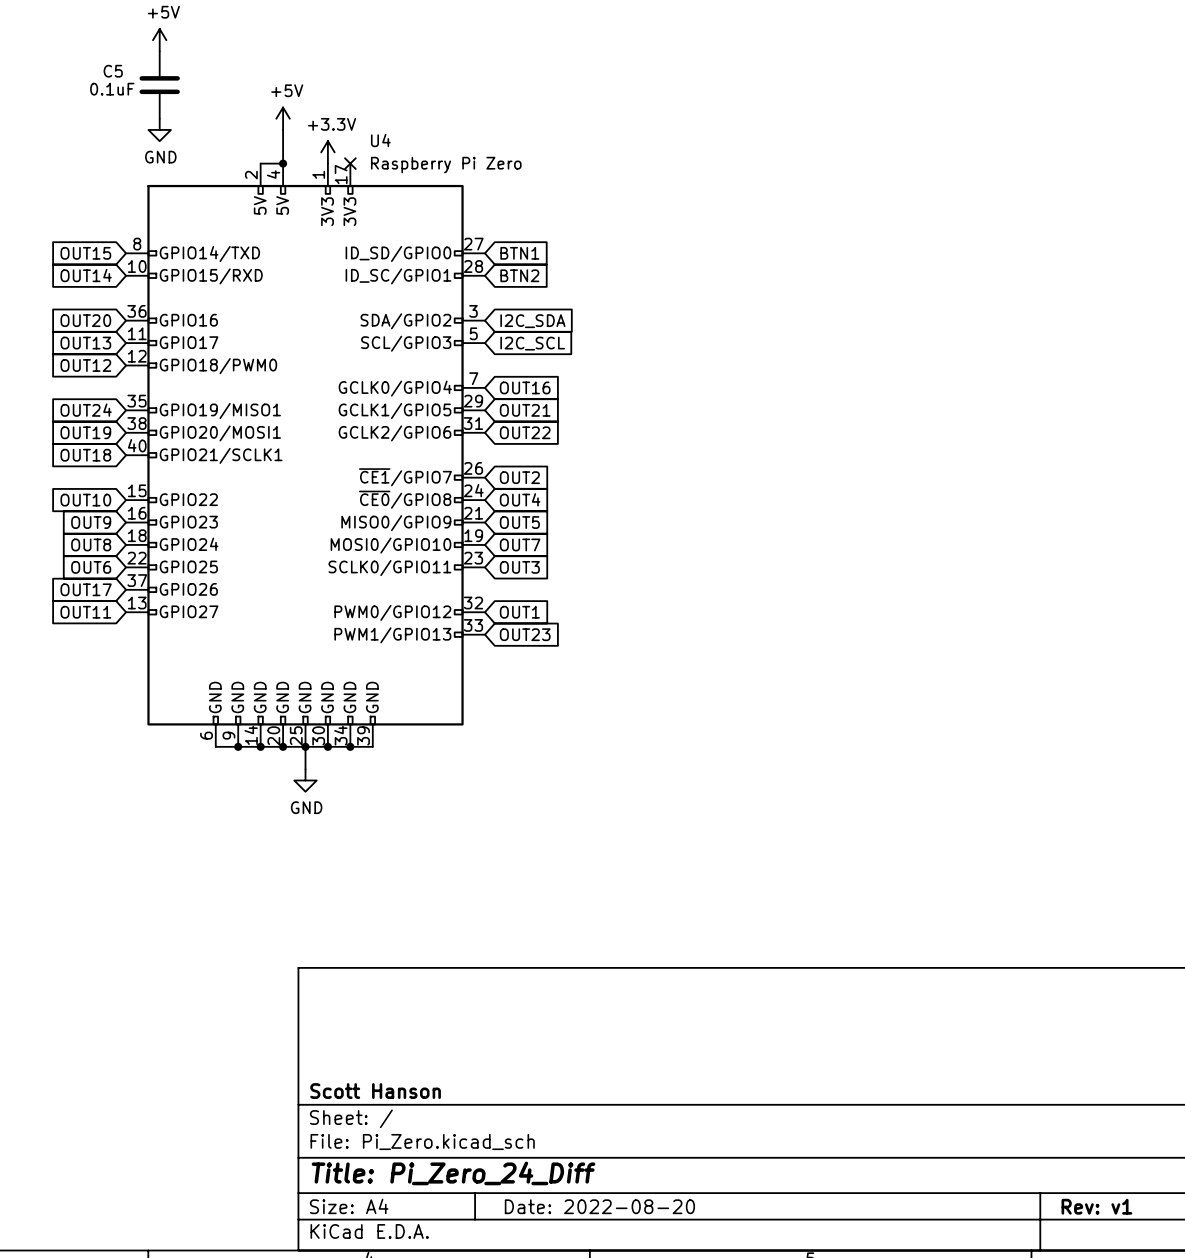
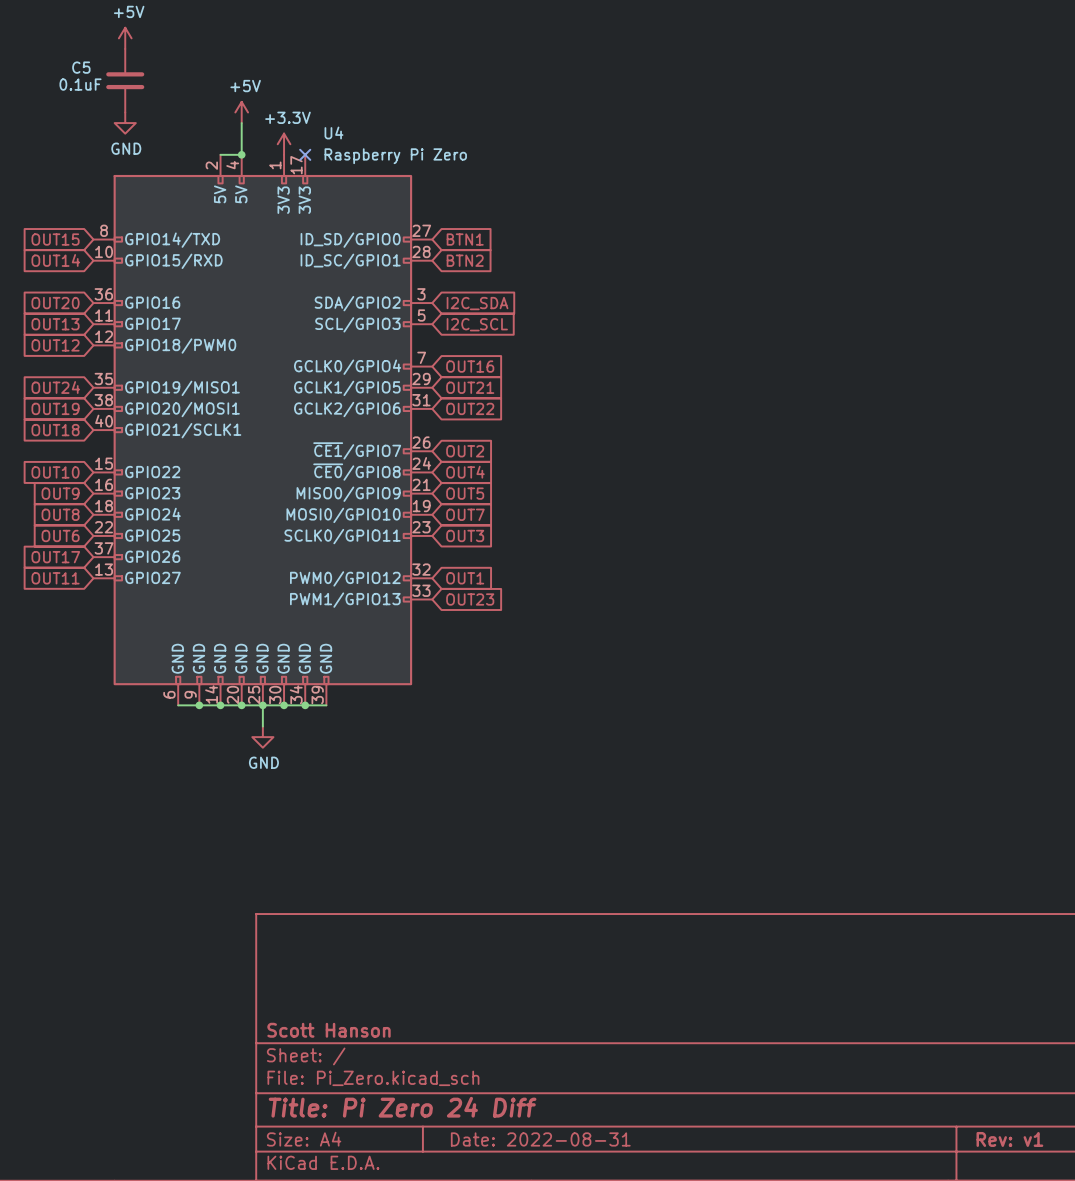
title block: Title: Pi_Zero_24_Diff (453, 1173) -> Title: Pi Zero 24 Diff (402, 1107)
title block: Date: 2022-08-20 (599, 1206) -> Date: 2022-08-31 (540, 1139)

